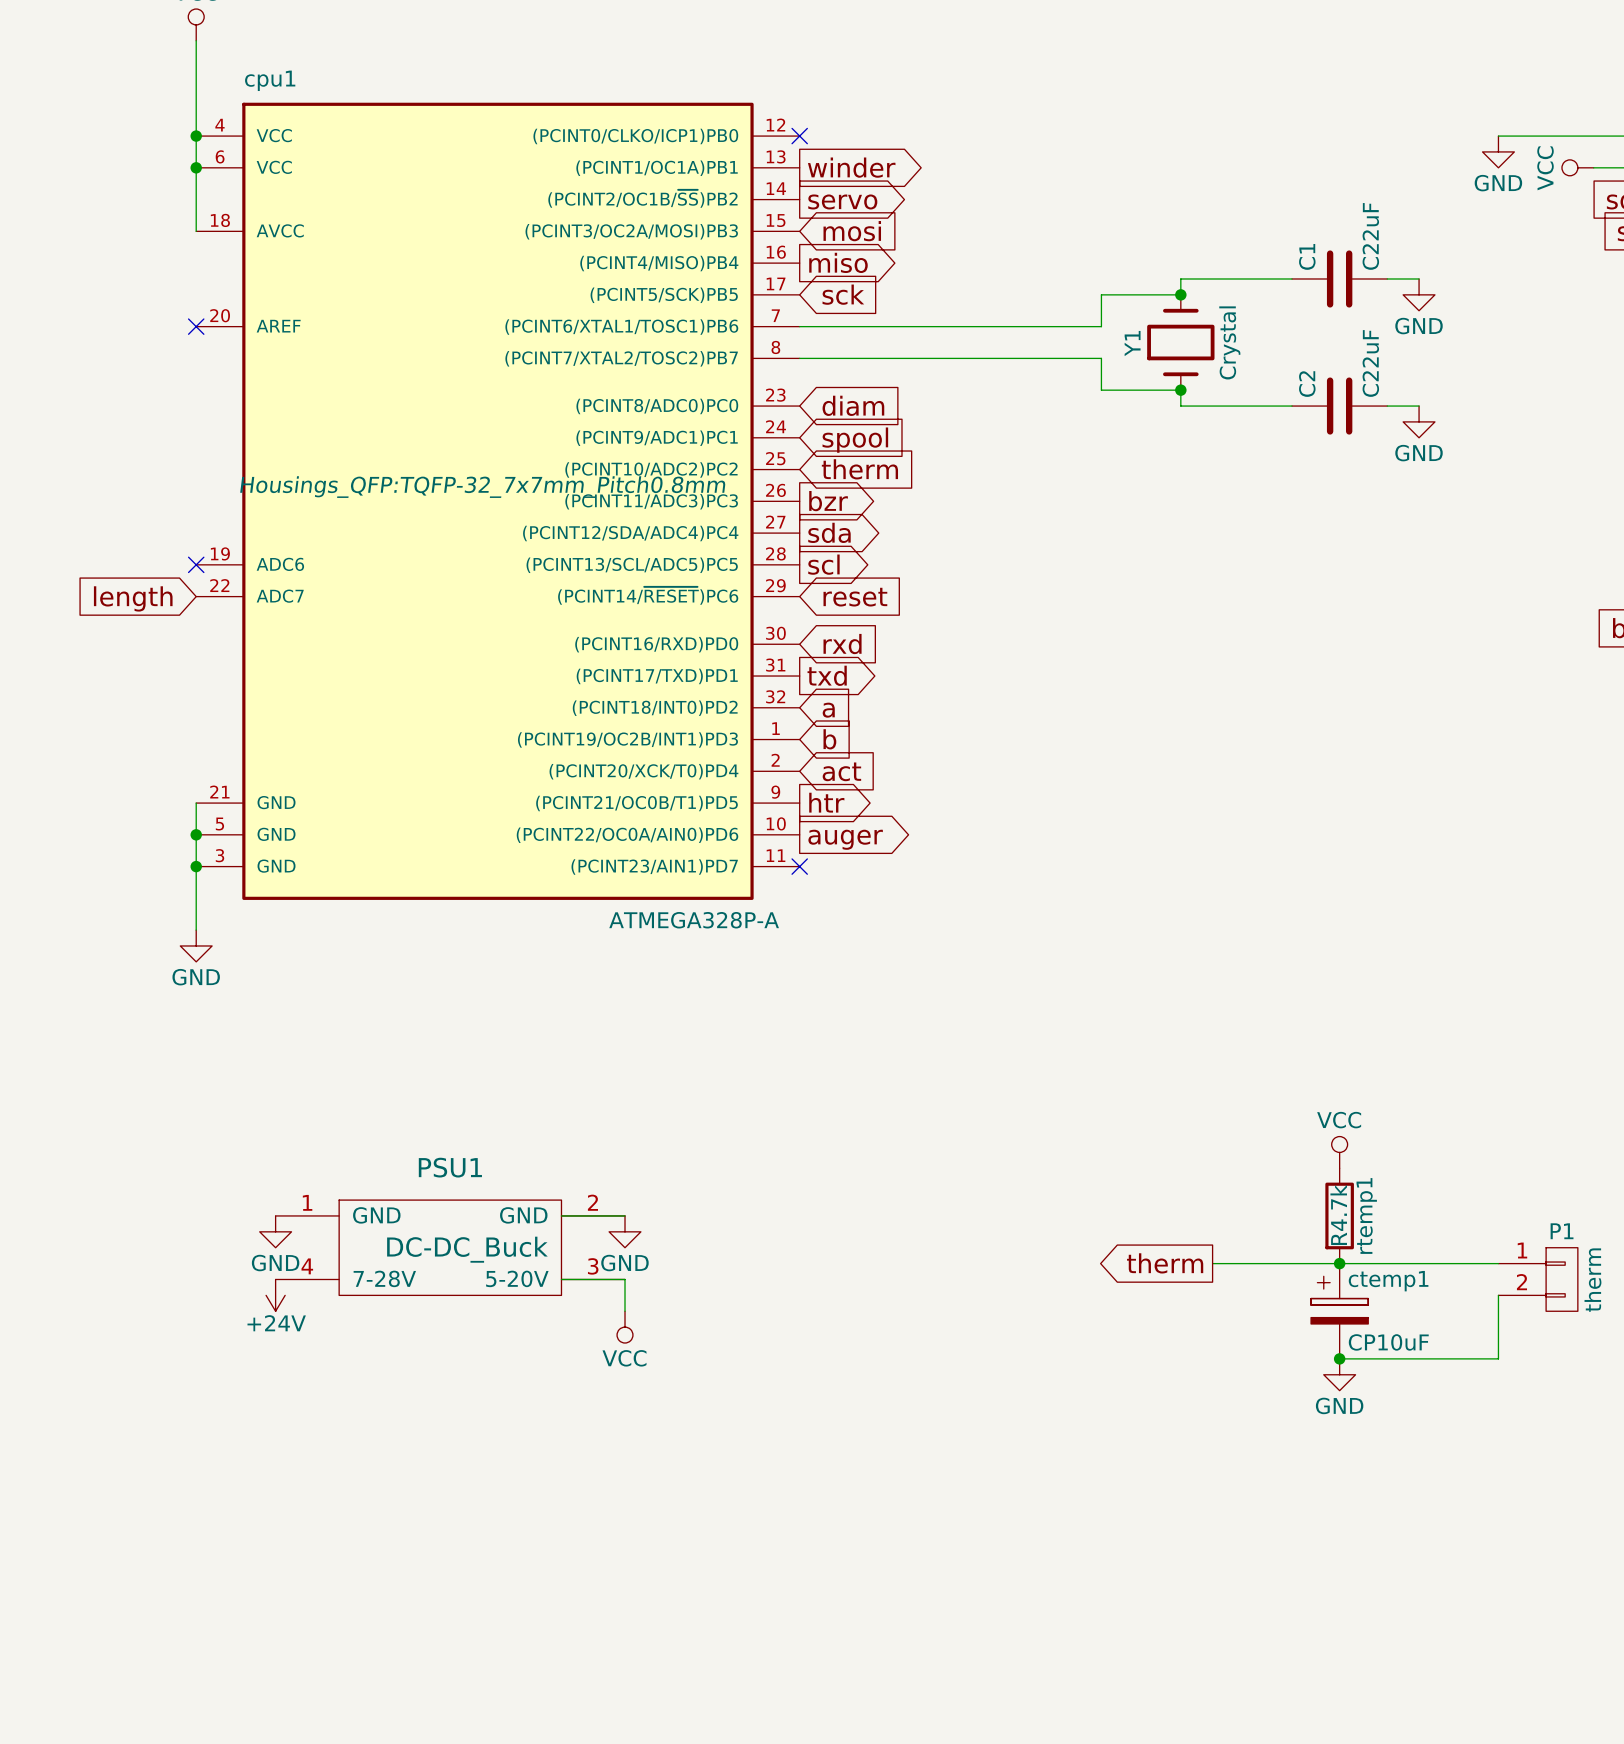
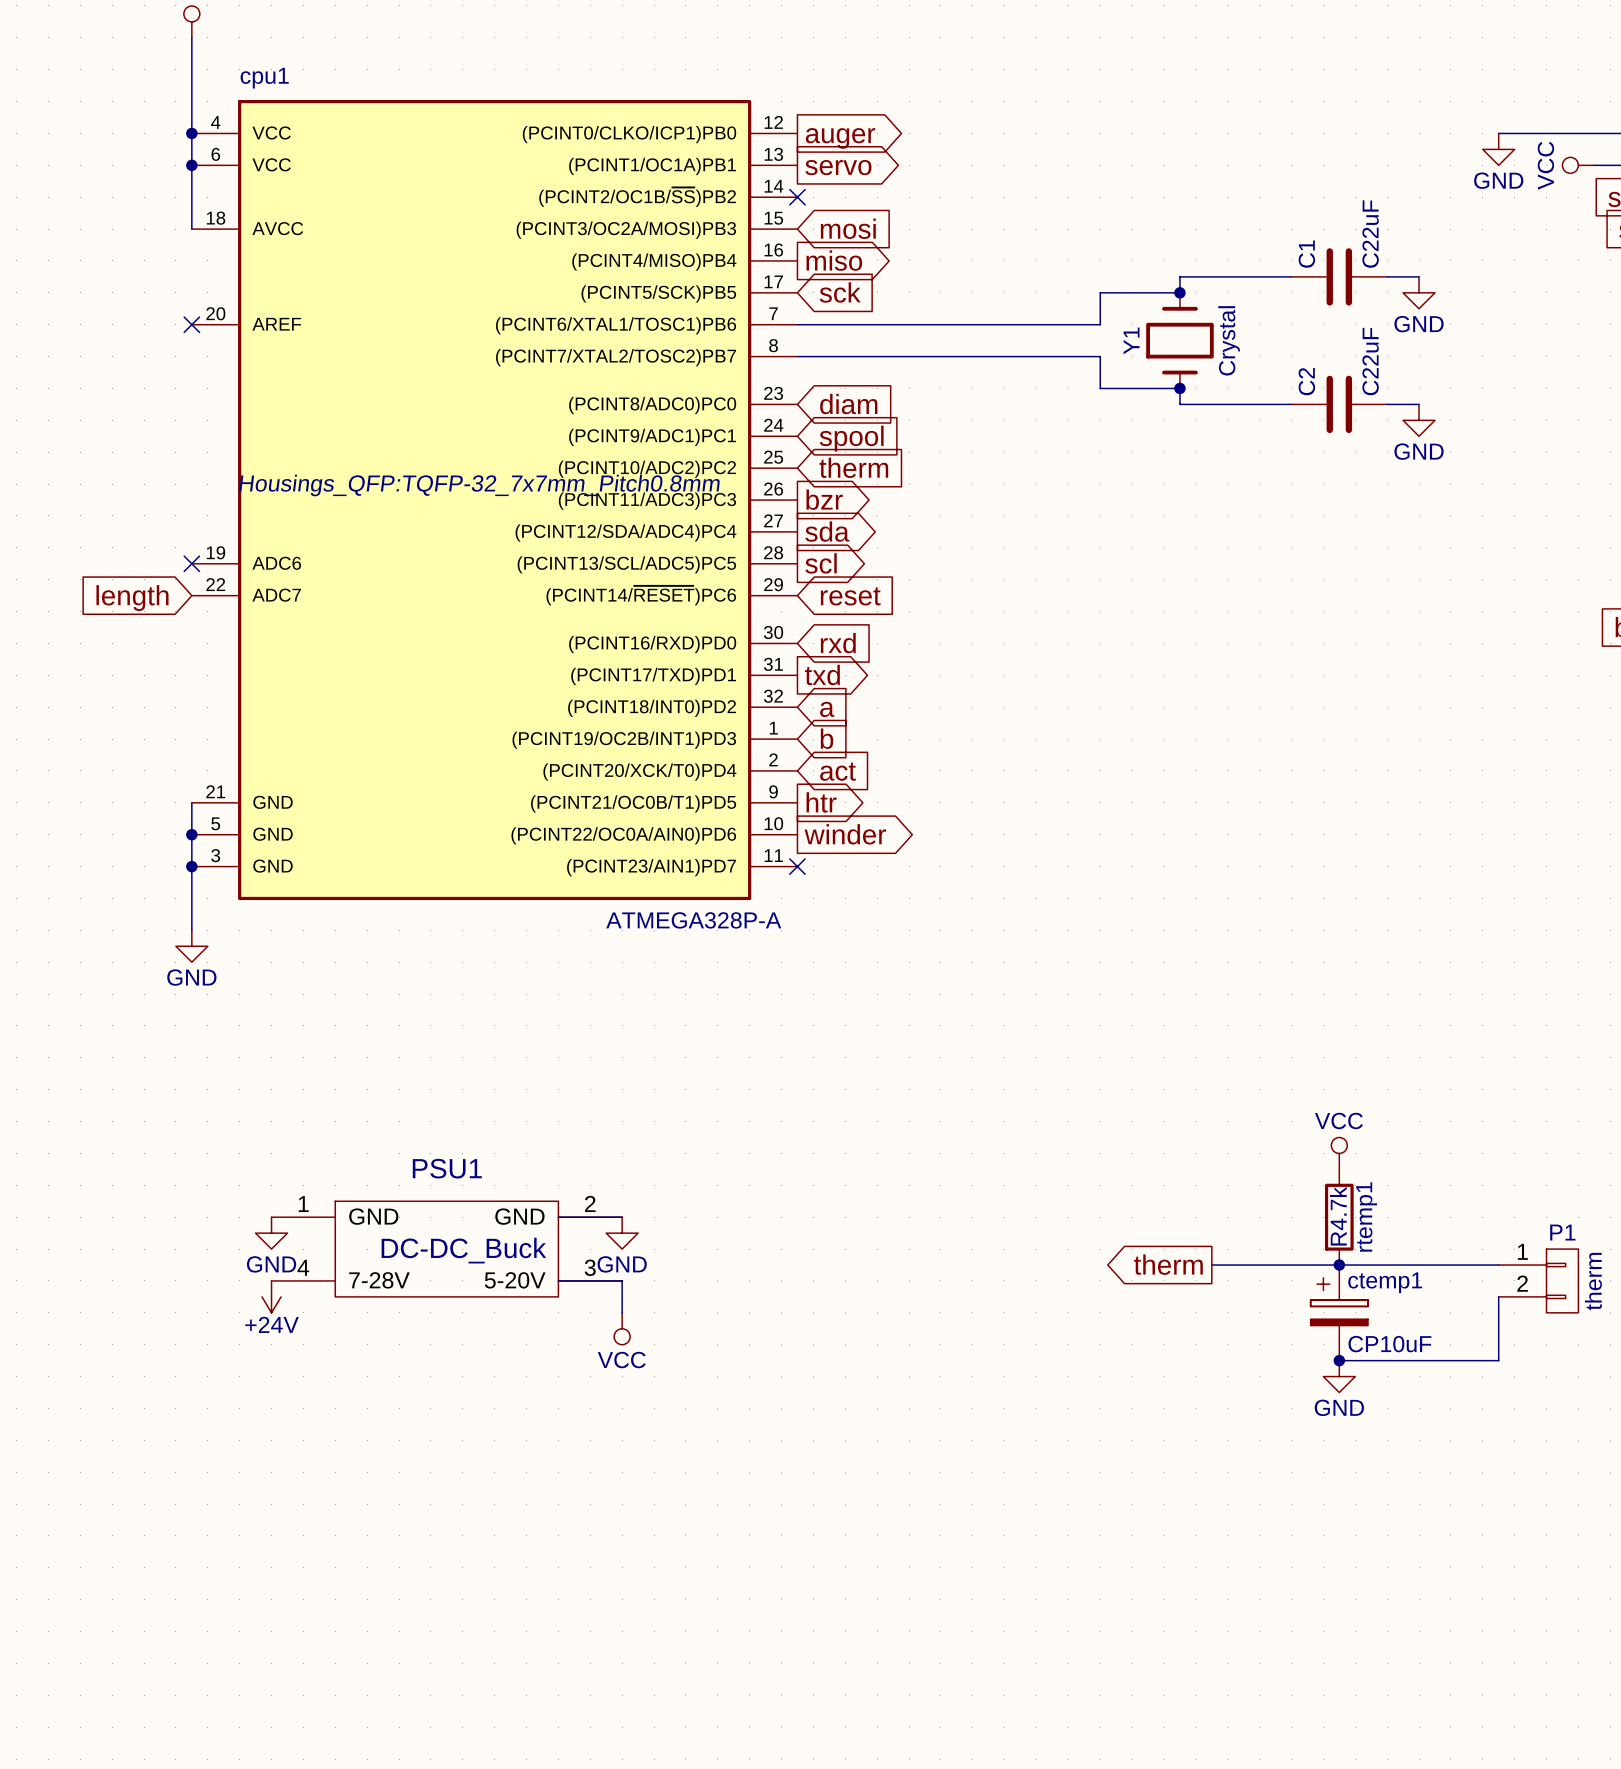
no-connect mark position: (799, 136) -> (797, 197)
global label: none -> auger (840, 138)
global label: winder (851, 167) -> servo (838, 167)
global label: servo (842, 201) -> none
global label: auger (845, 839) -> winder (845, 834)

